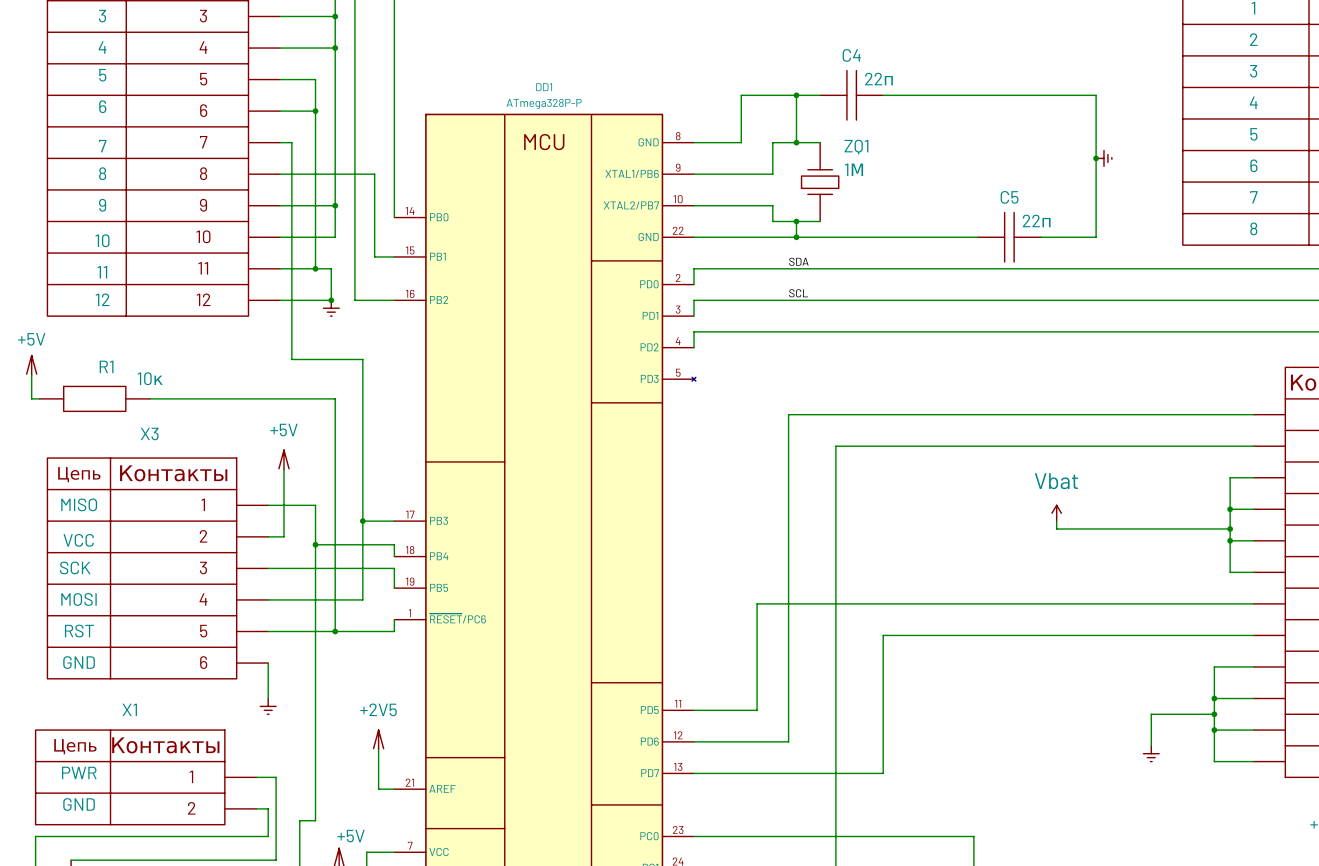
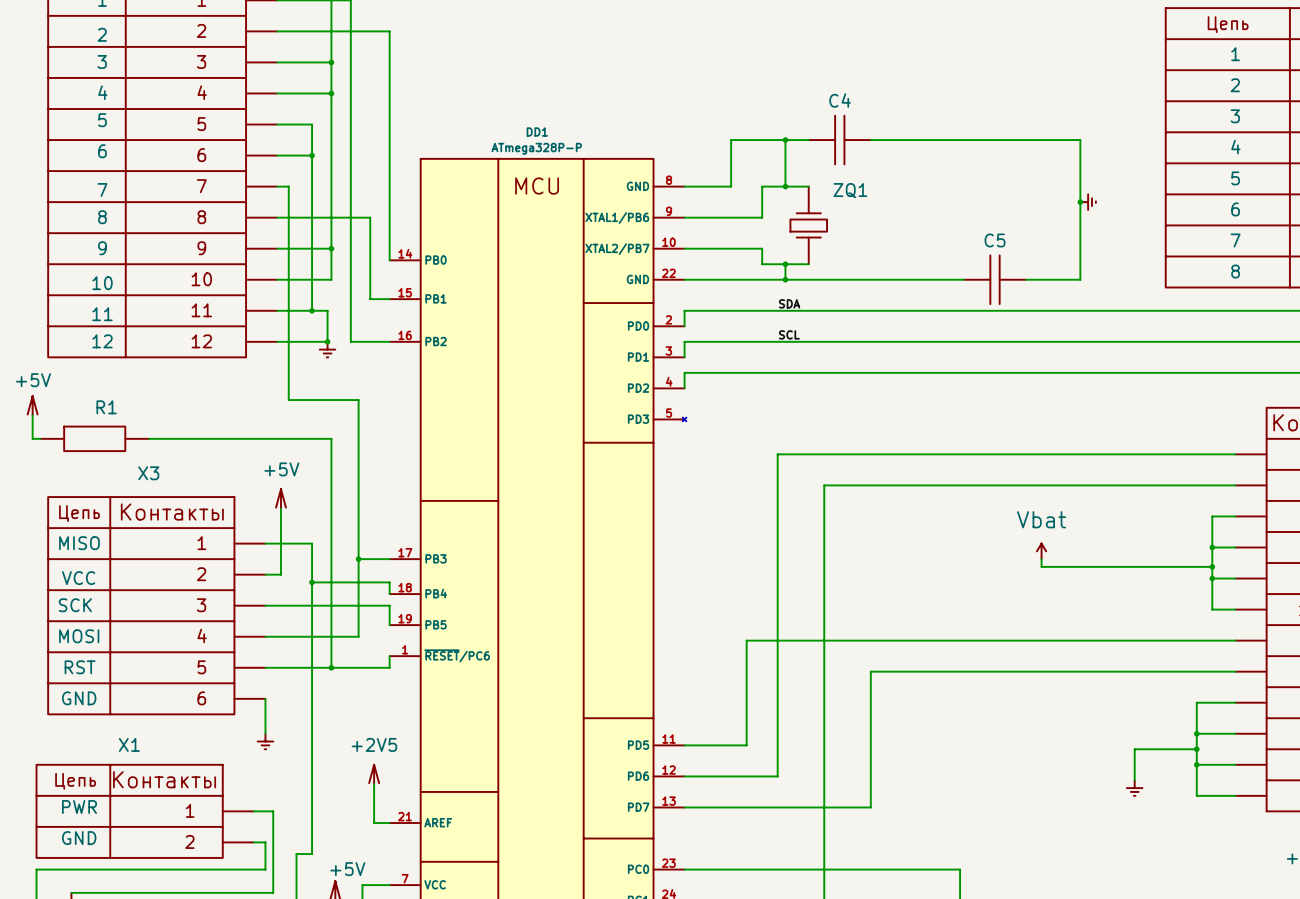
C4 value: 22п (879, 79) -> none
ZQ1 value: 1М (853, 169) -> none
C5 value: 22п (1036, 220) -> none
R1 value: 10к (150, 378) -> none

